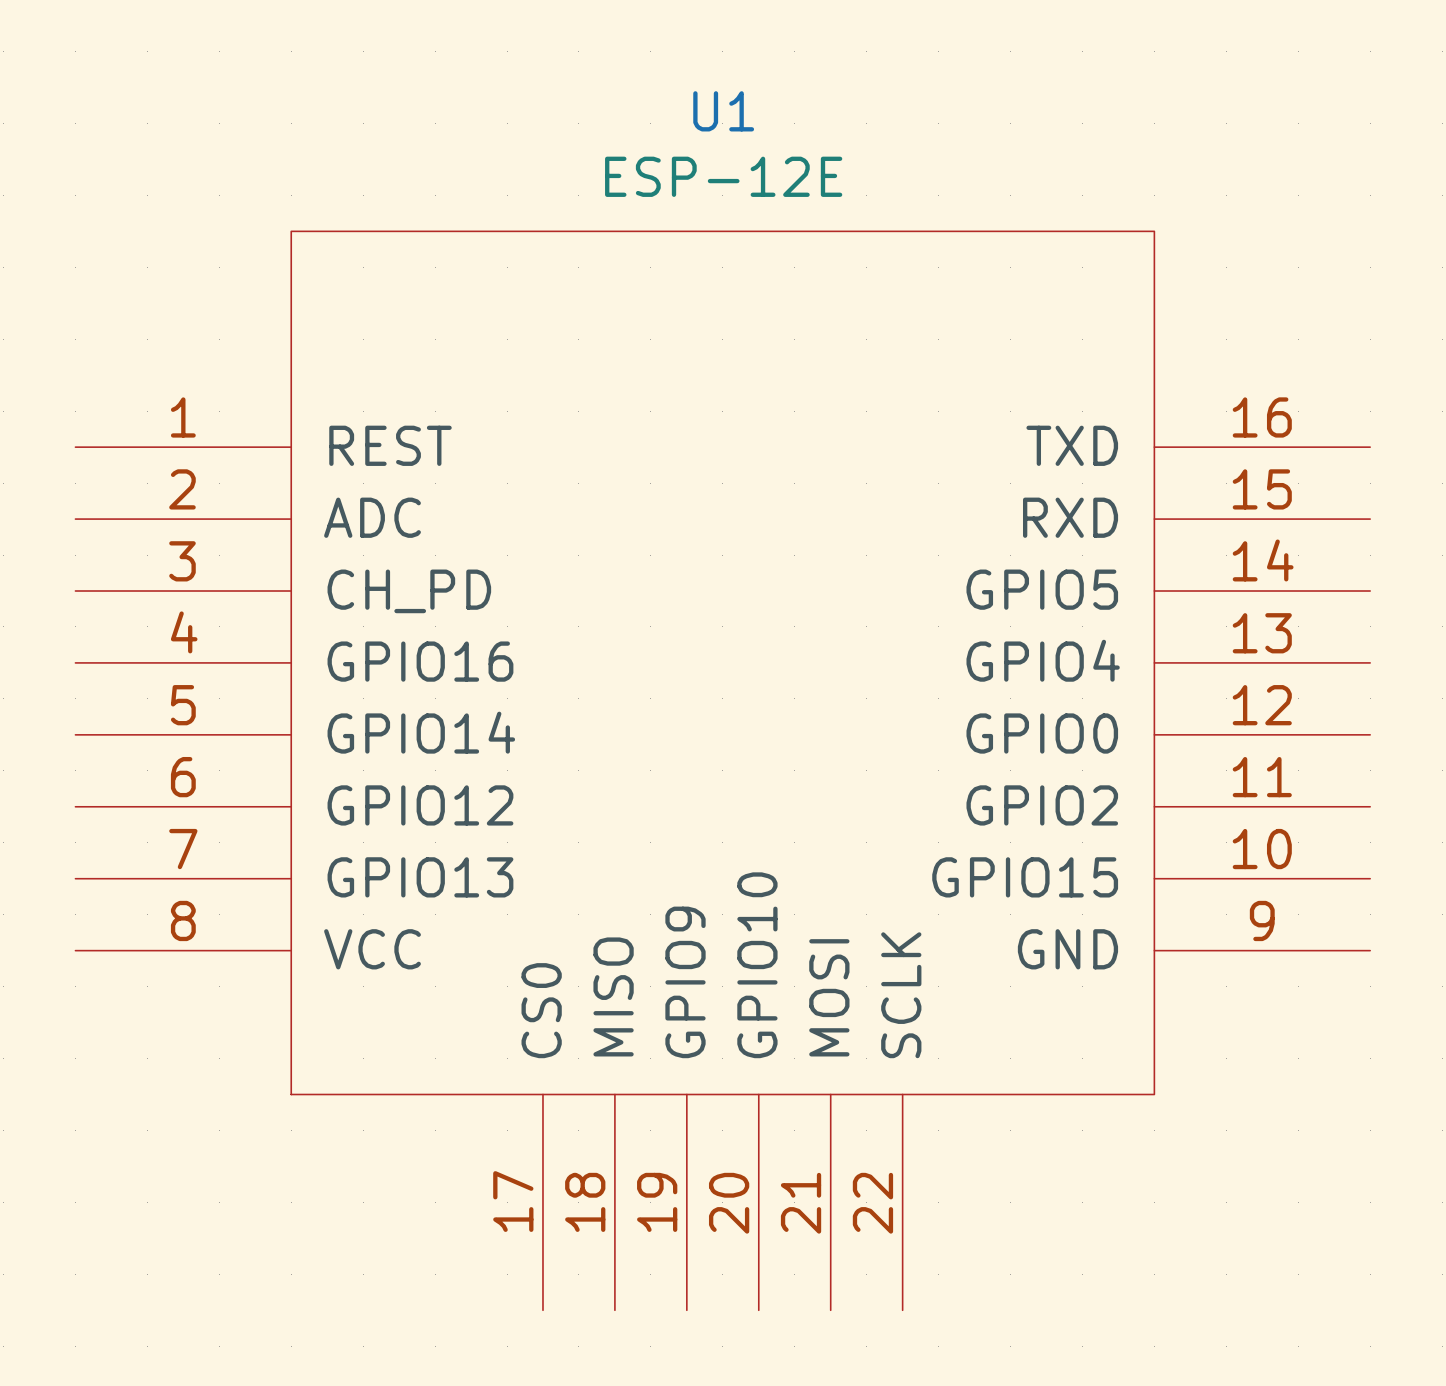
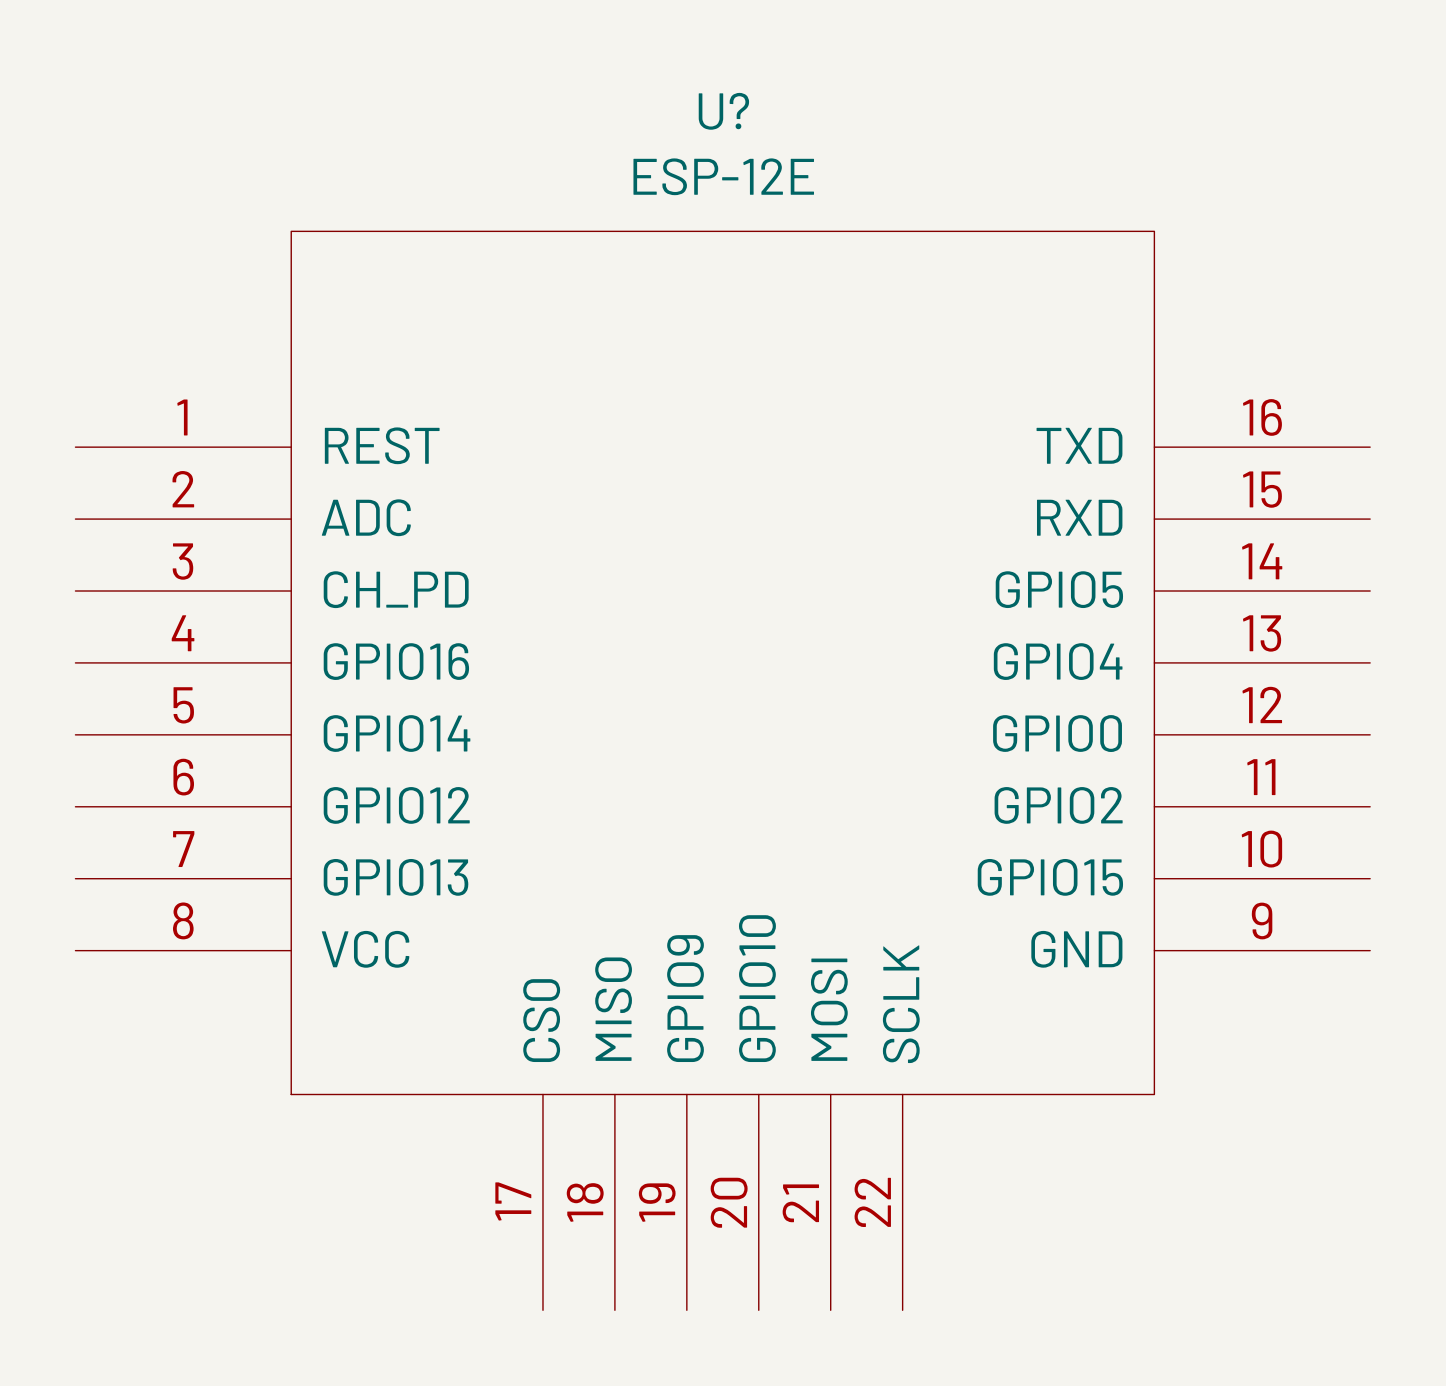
U1 name: U1 (723, 111) -> U? (723, 111)

